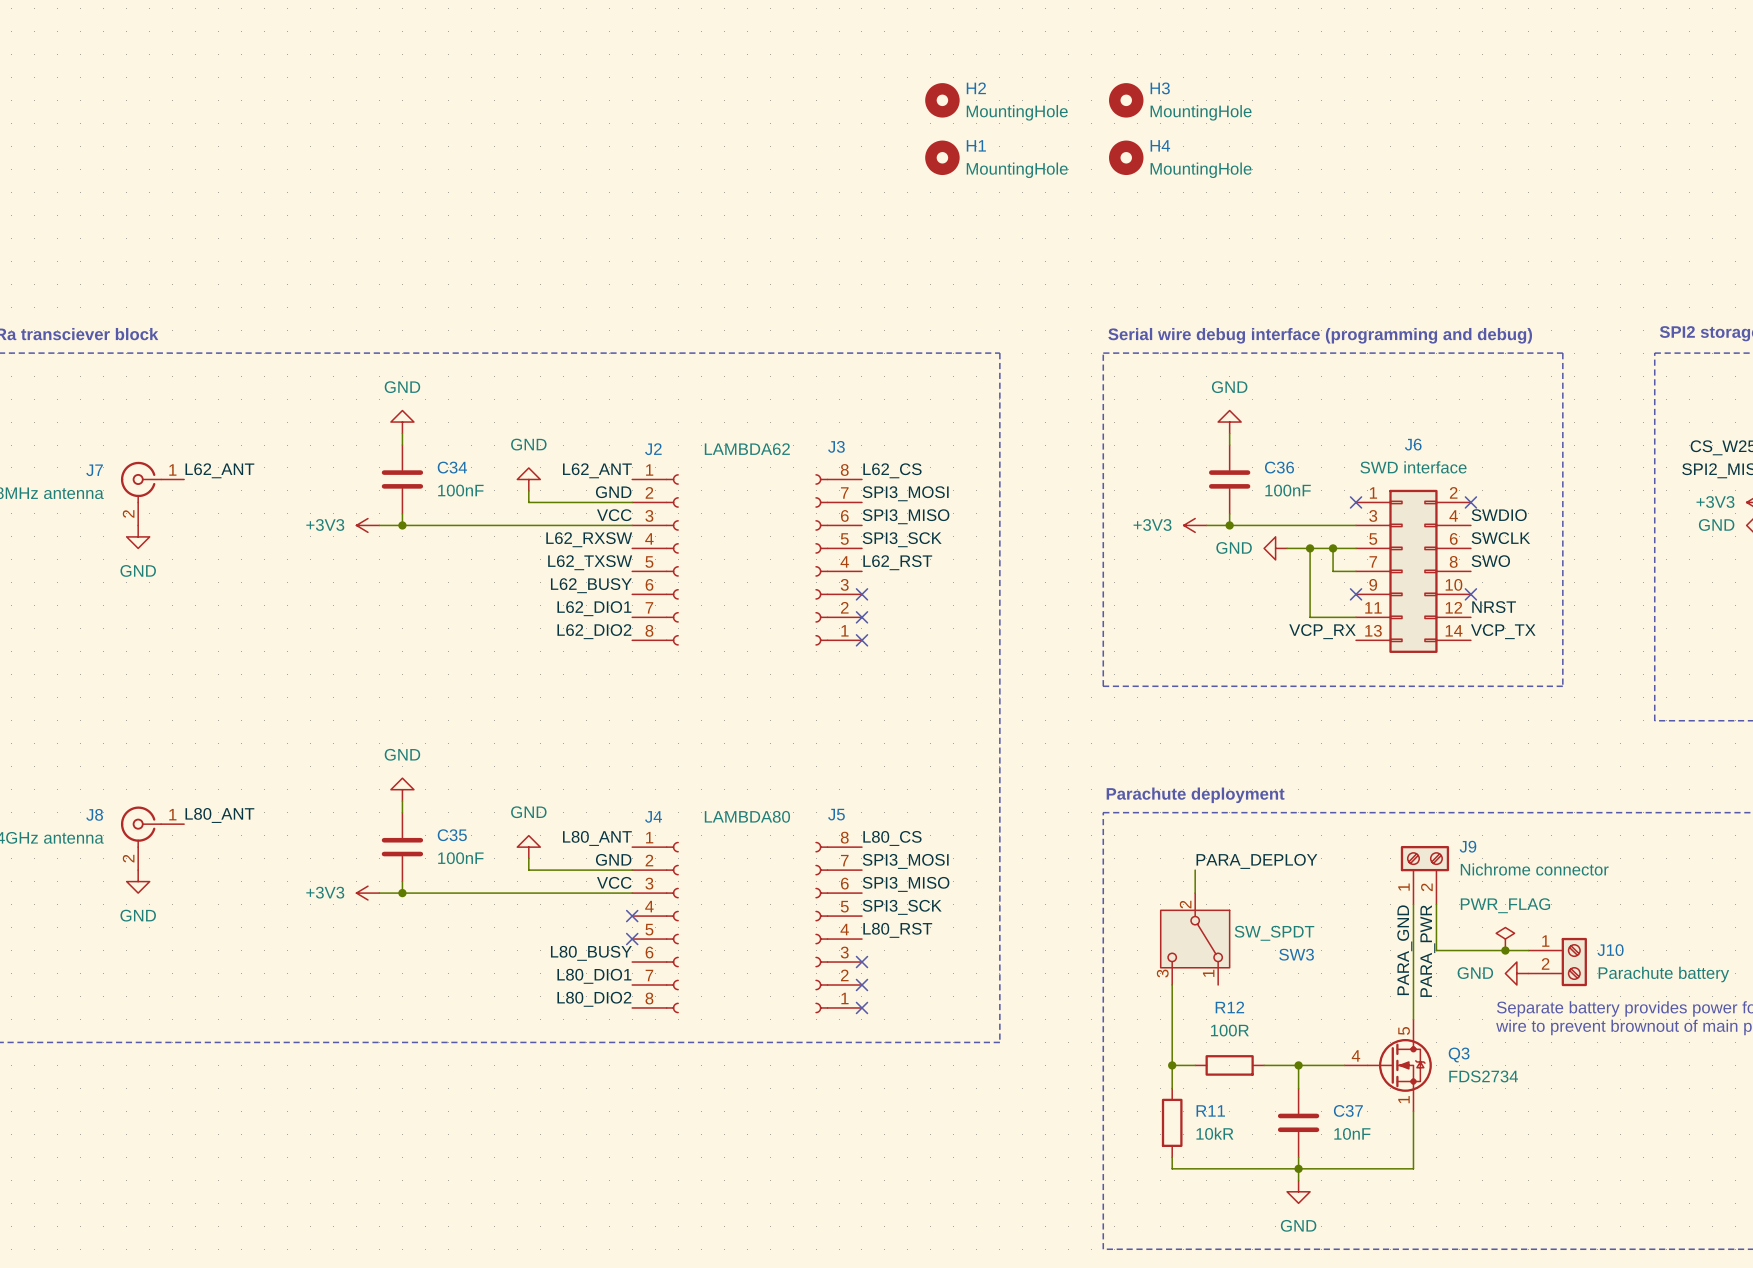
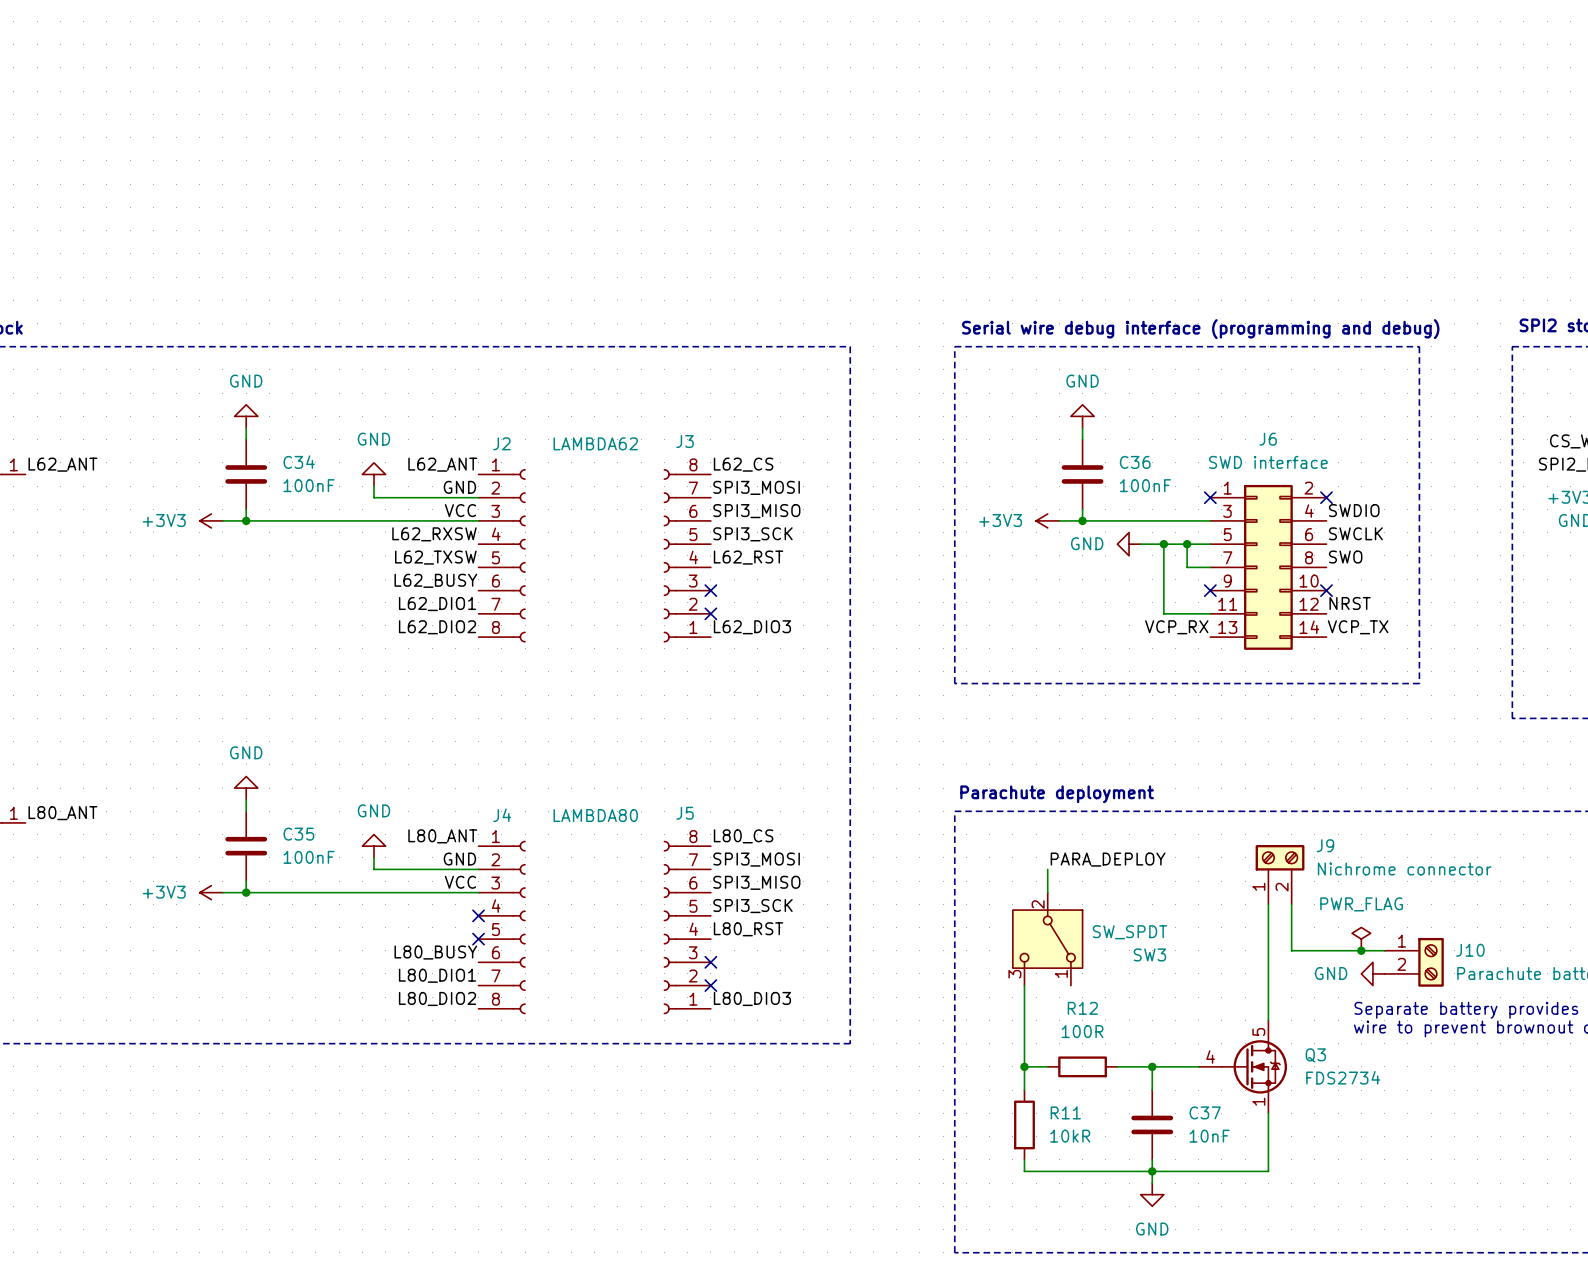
H2: MountingHole (942, 100) -> none
H3: MountingHole (1126, 100) -> none
H1: MountingHole (942, 157) -> none
H4: MountingHole (1126, 157) -> none
label: none -> L62_DIO3 (752, 627)
no-connect mark: (861, 640) -> none
label: PARA_GND (1404, 950) -> none
label: PARA_PWR (1427, 951) -> none
label: none -> L80_DIO3 (752, 998)
no-connect mark: (861, 1007) -> none

